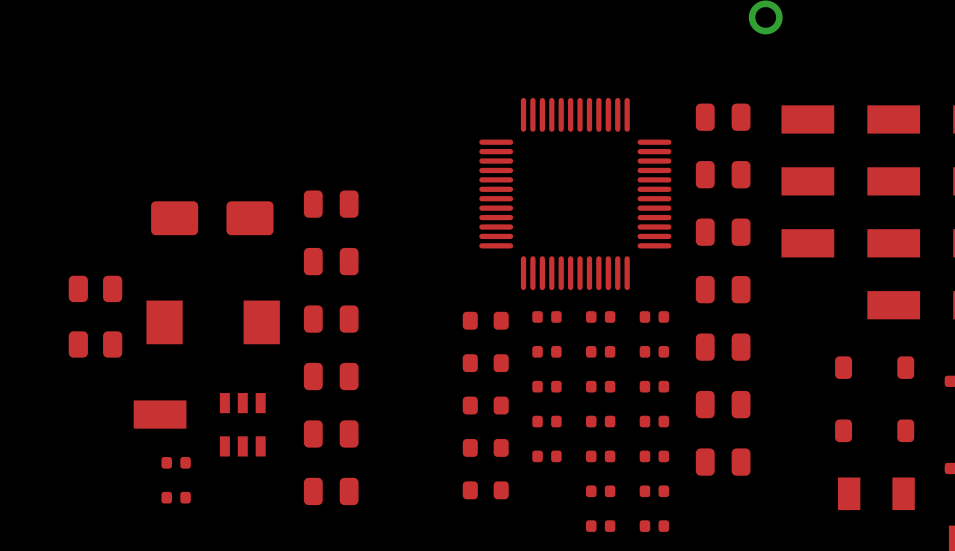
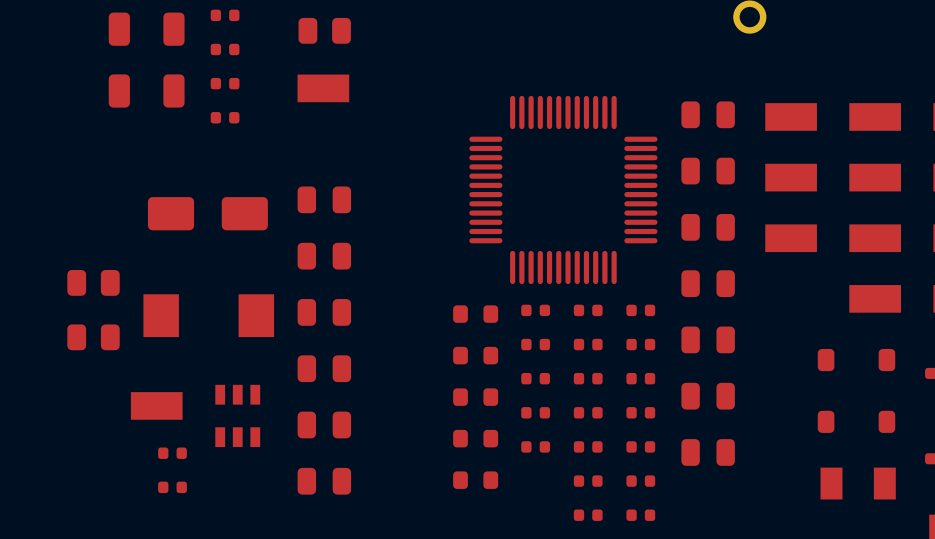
part: none -> (225, 15)
part: none -> (146, 29)
part: none -> (324, 30)
part: none -> (225, 49)
part: none -> (225, 83)
part: none -> (323, 88)
part: none -> (146, 90)
part: none -> (225, 117)

